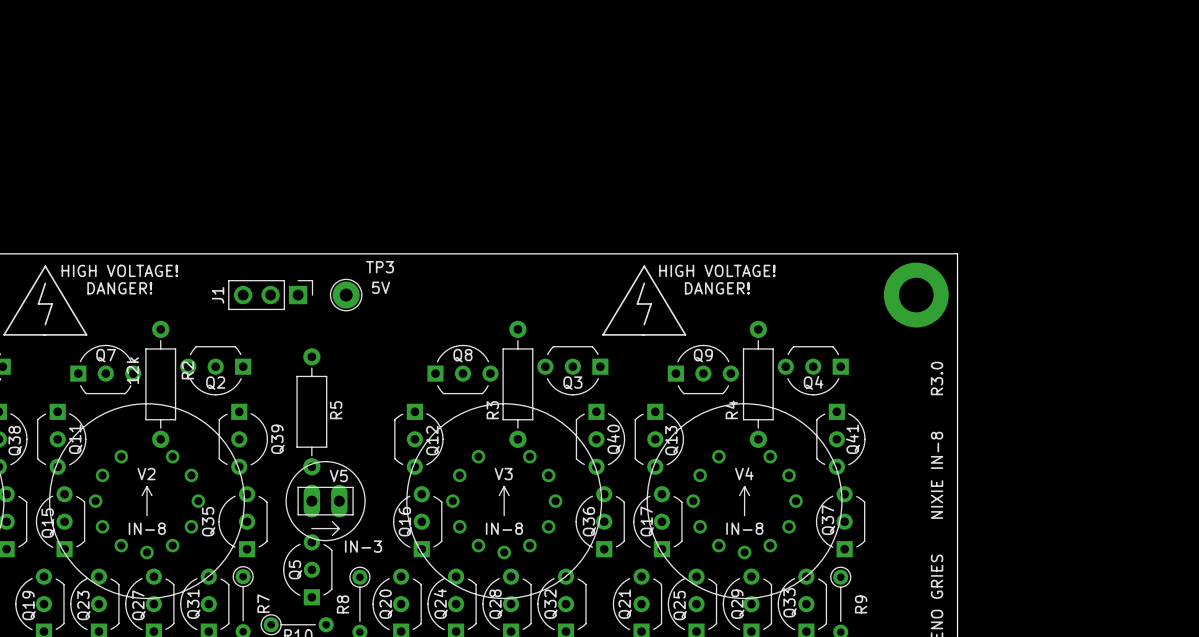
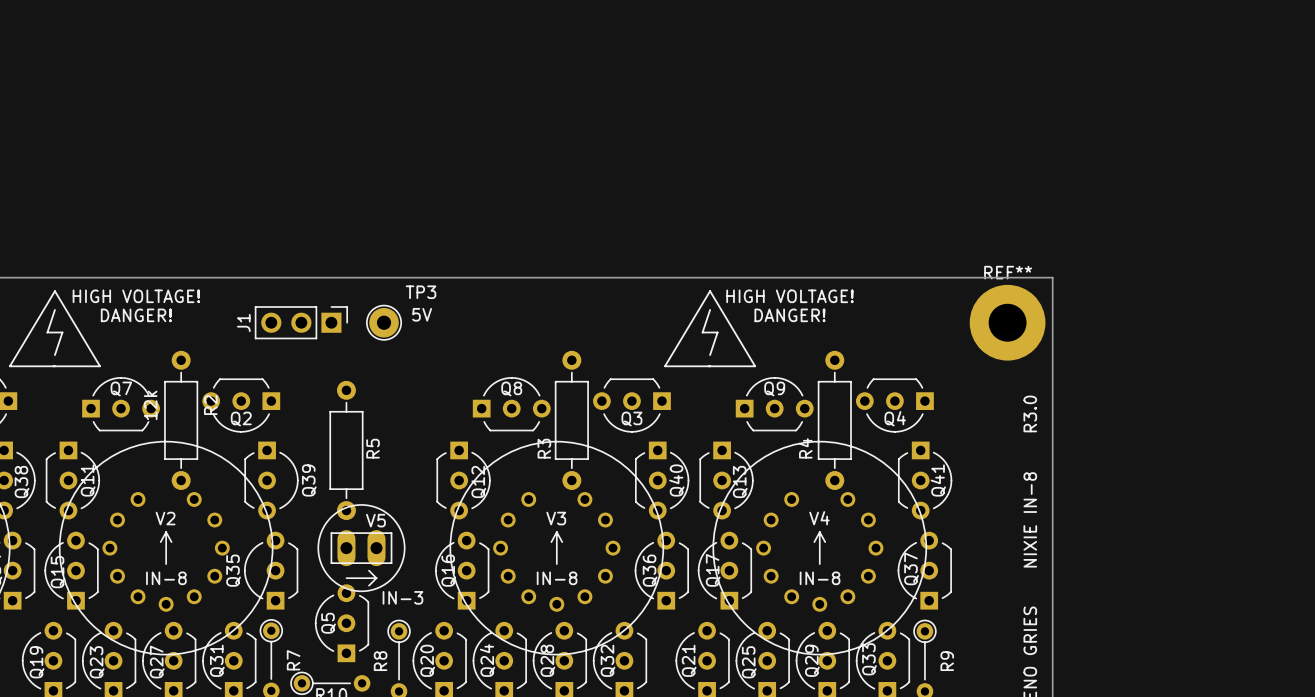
part: (916, 295) -> none
REF**: none -> (1007, 322)

